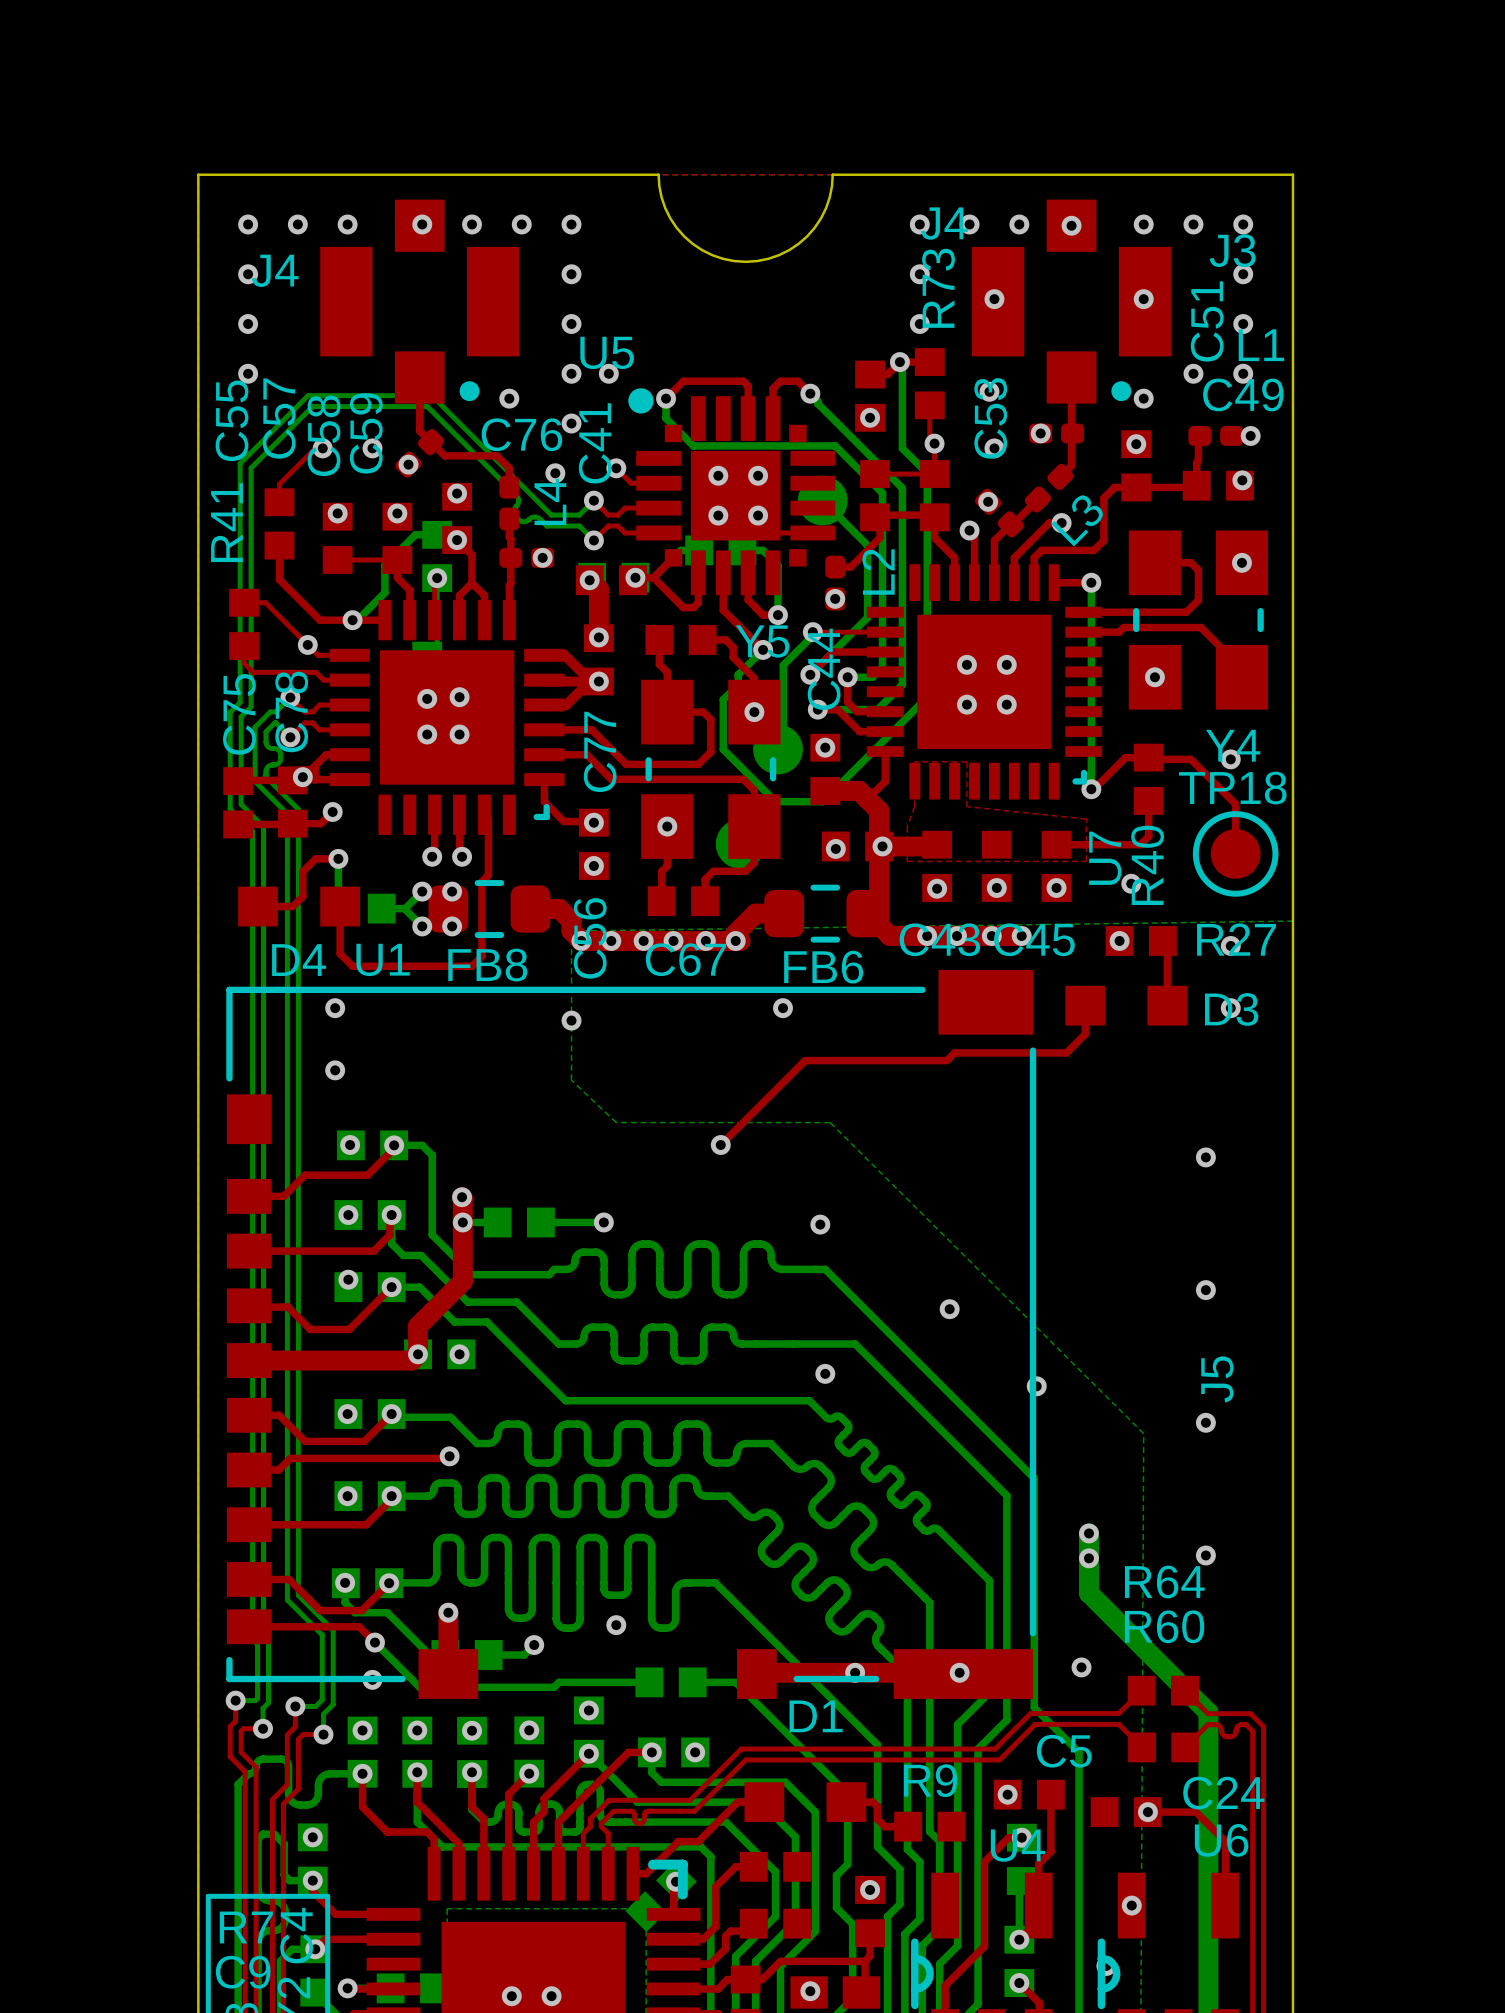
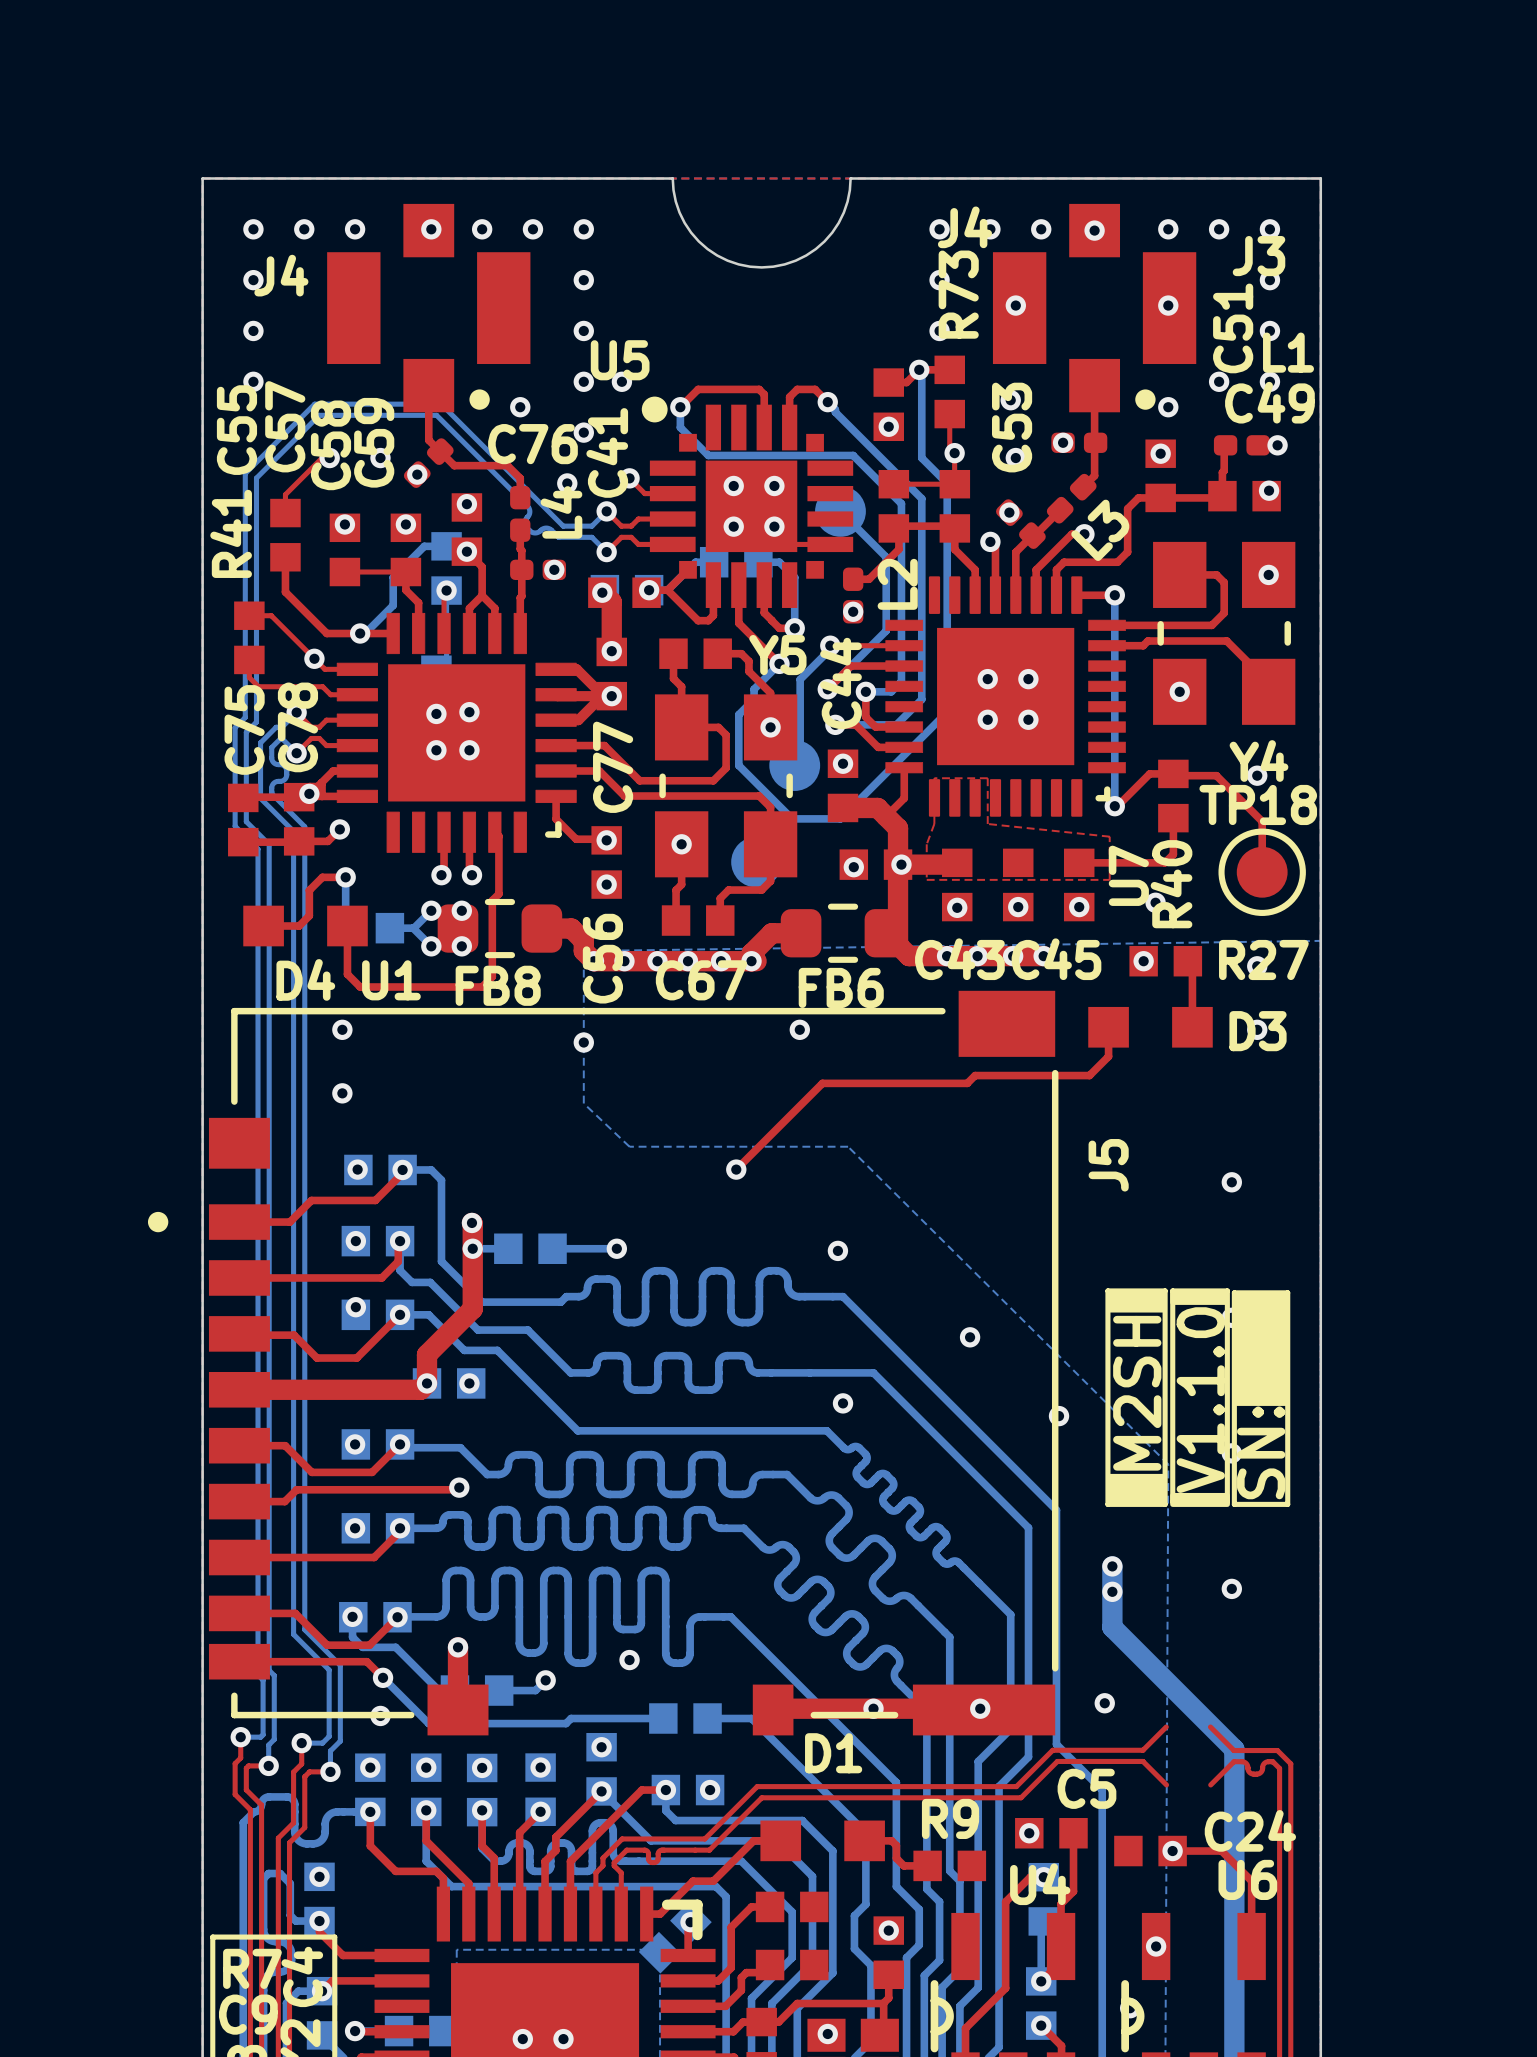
J5 footprint: [226, 969, 1037, 1699] -> [147, 990, 1059, 1736]
line: none -> (1107, 1290) (1165, 1290) (1165, 1504) (1107, 1504) (1107, 1290)
drawing: none -> [1107, 1290, 1290, 1406]
line: none -> (1172, 1290) (1172, 1501) (1227, 1501) (1227, 1290) (1172, 1290)
line: none -> (1234, 1292) (1287, 1292) (1287, 1504) (1234, 1504) (1234, 1292)
text: none -> M2SH (1137, 1393)
J5 name position: J5 (1217, 1379) -> J5 (1108, 1165)
text: none -> V1.1.0 (1200, 1400)
text: none -> SN: (1261, 1452)
drawing: none -> [1107, 1473, 1230, 1507]
R64: (1163, 1690) -> none
R60: (1163, 1747) -> none

